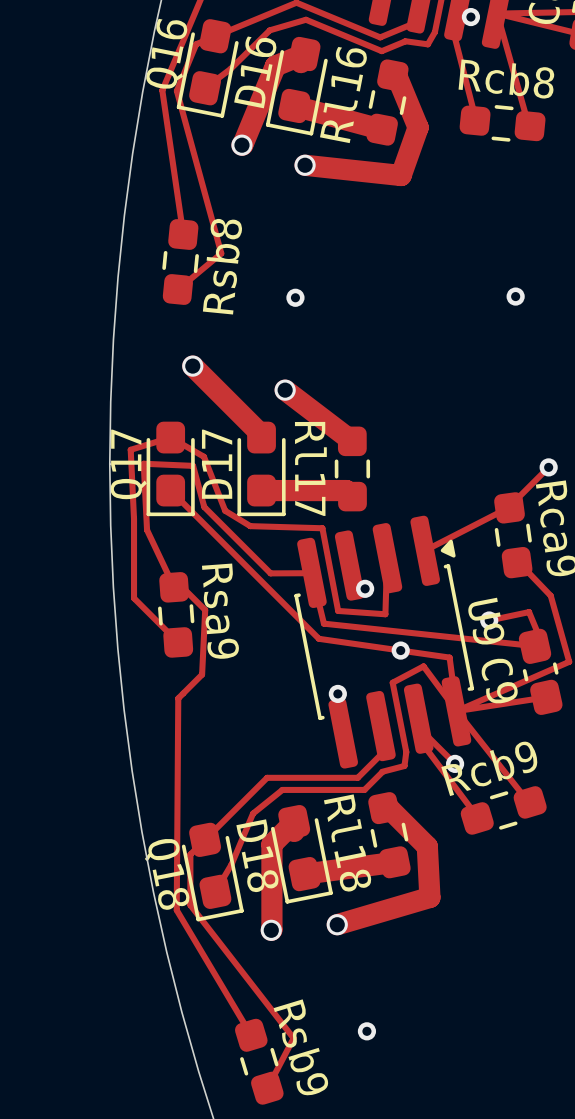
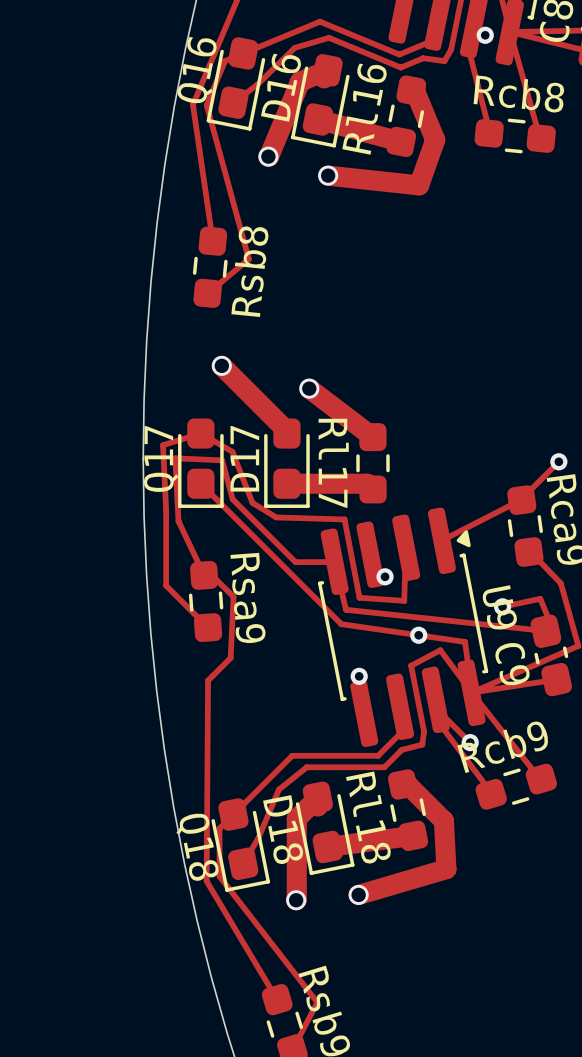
via: (515, 296) -> none
via: (295, 297) -> none
via: (366, 1031) -> none

